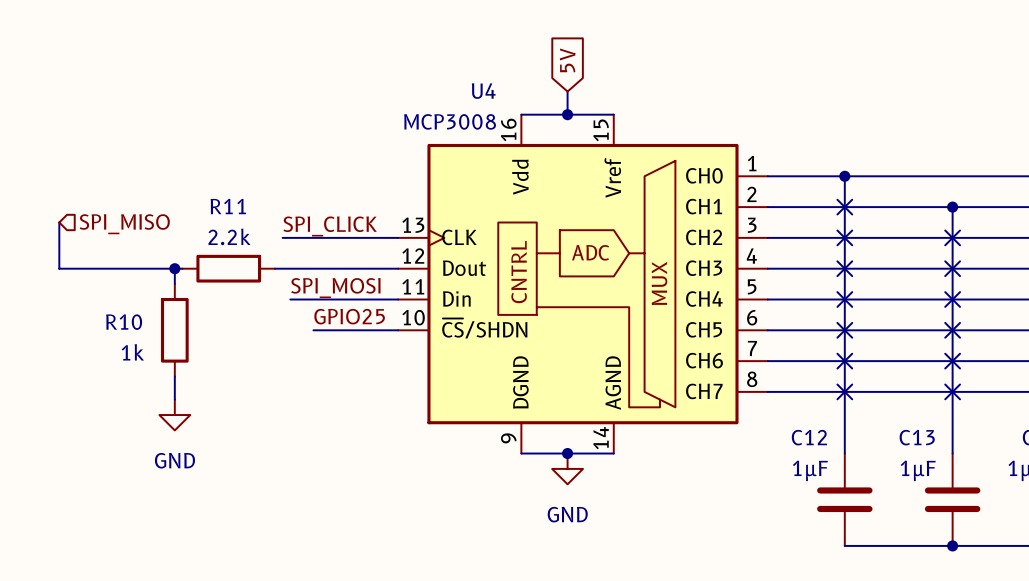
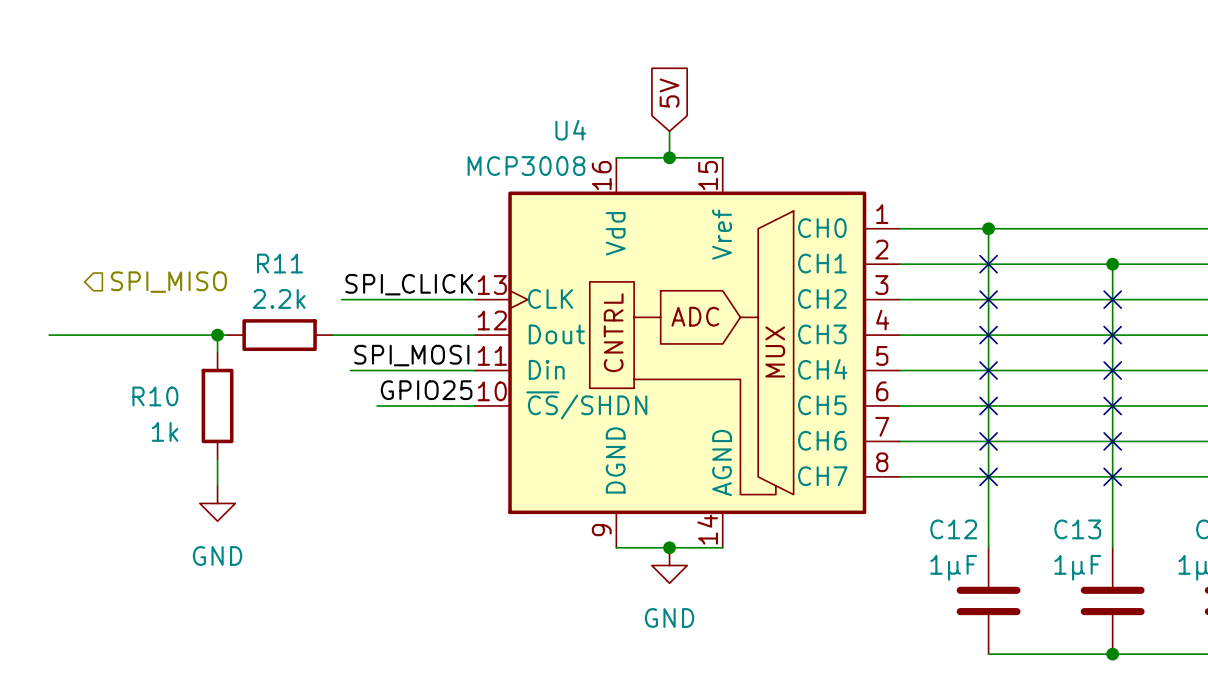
wire: (59, 222) (59, 268) -> (49, 335) (84, 335)

